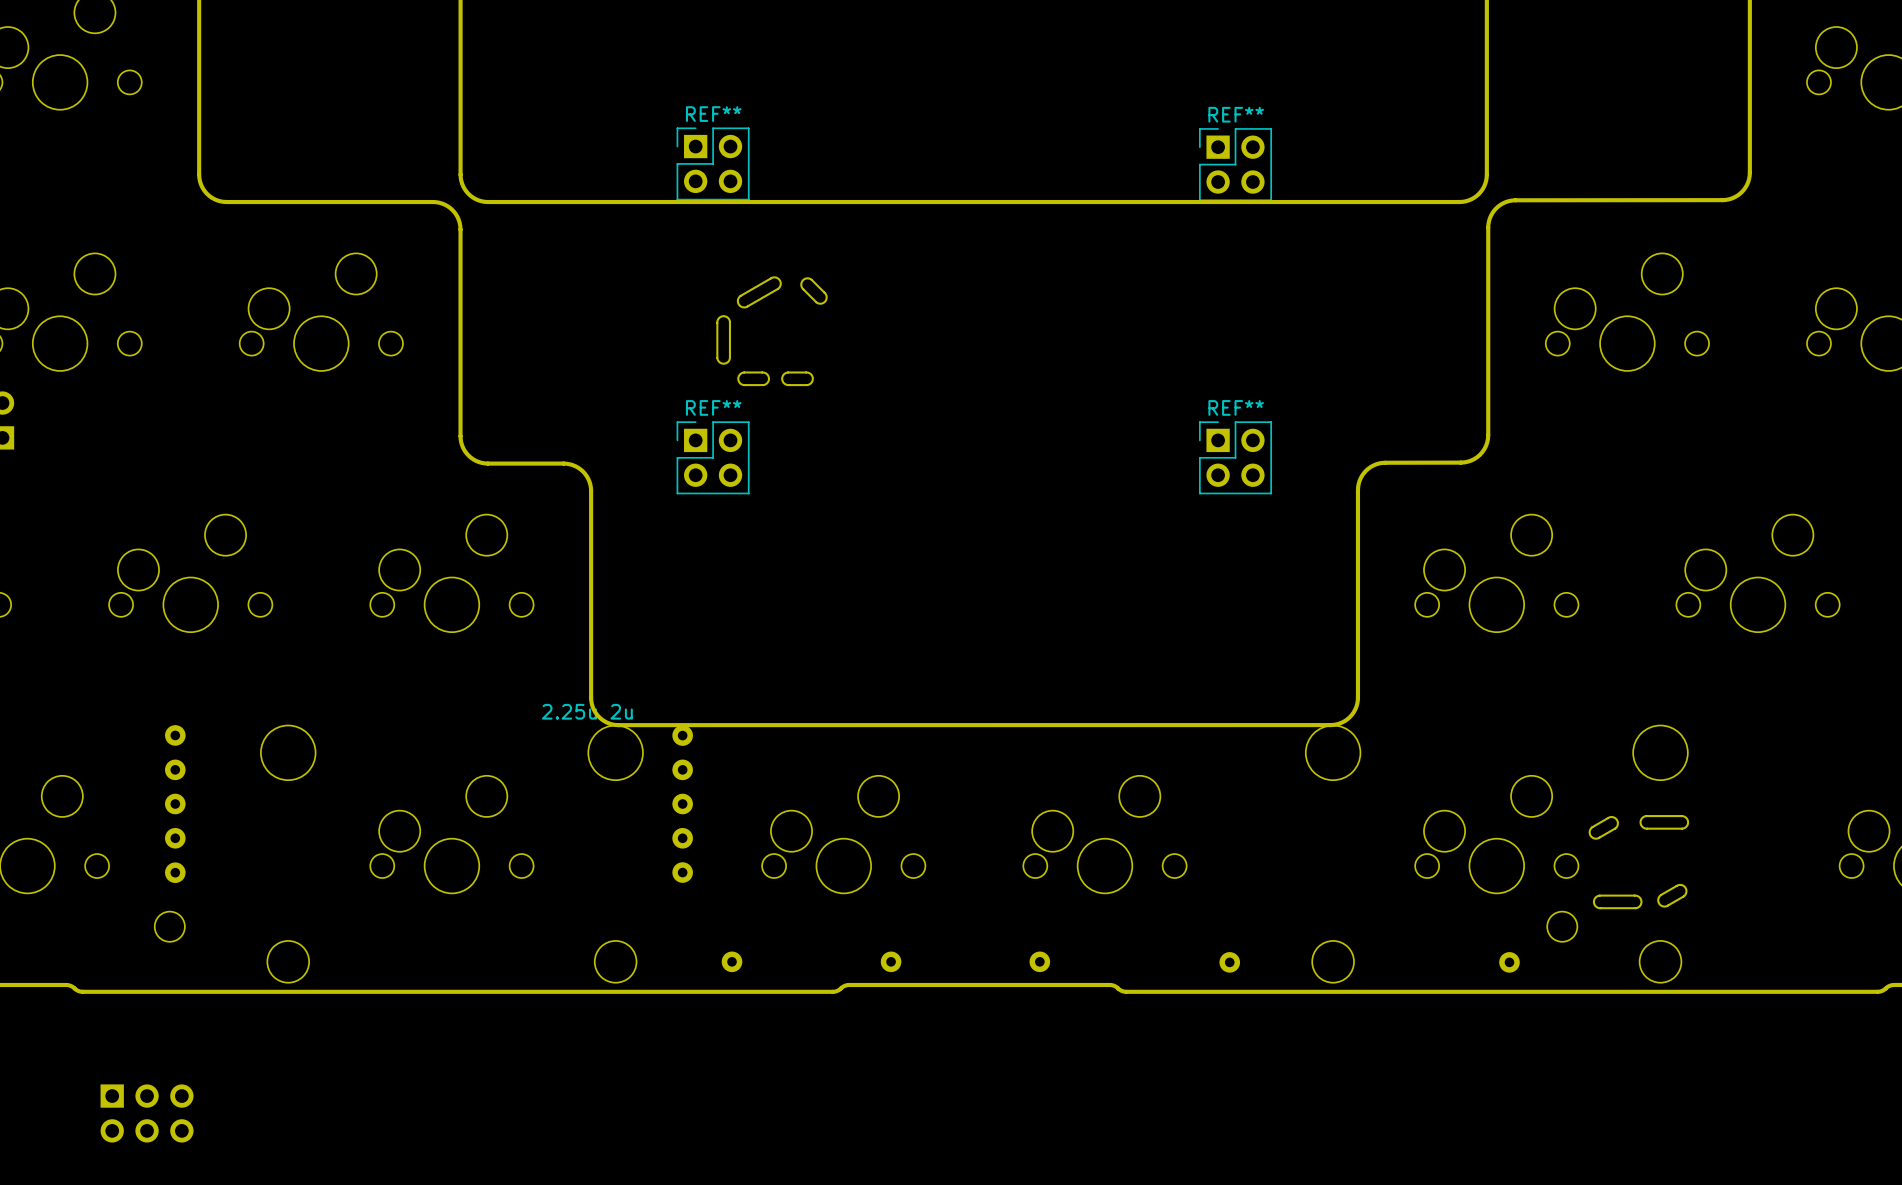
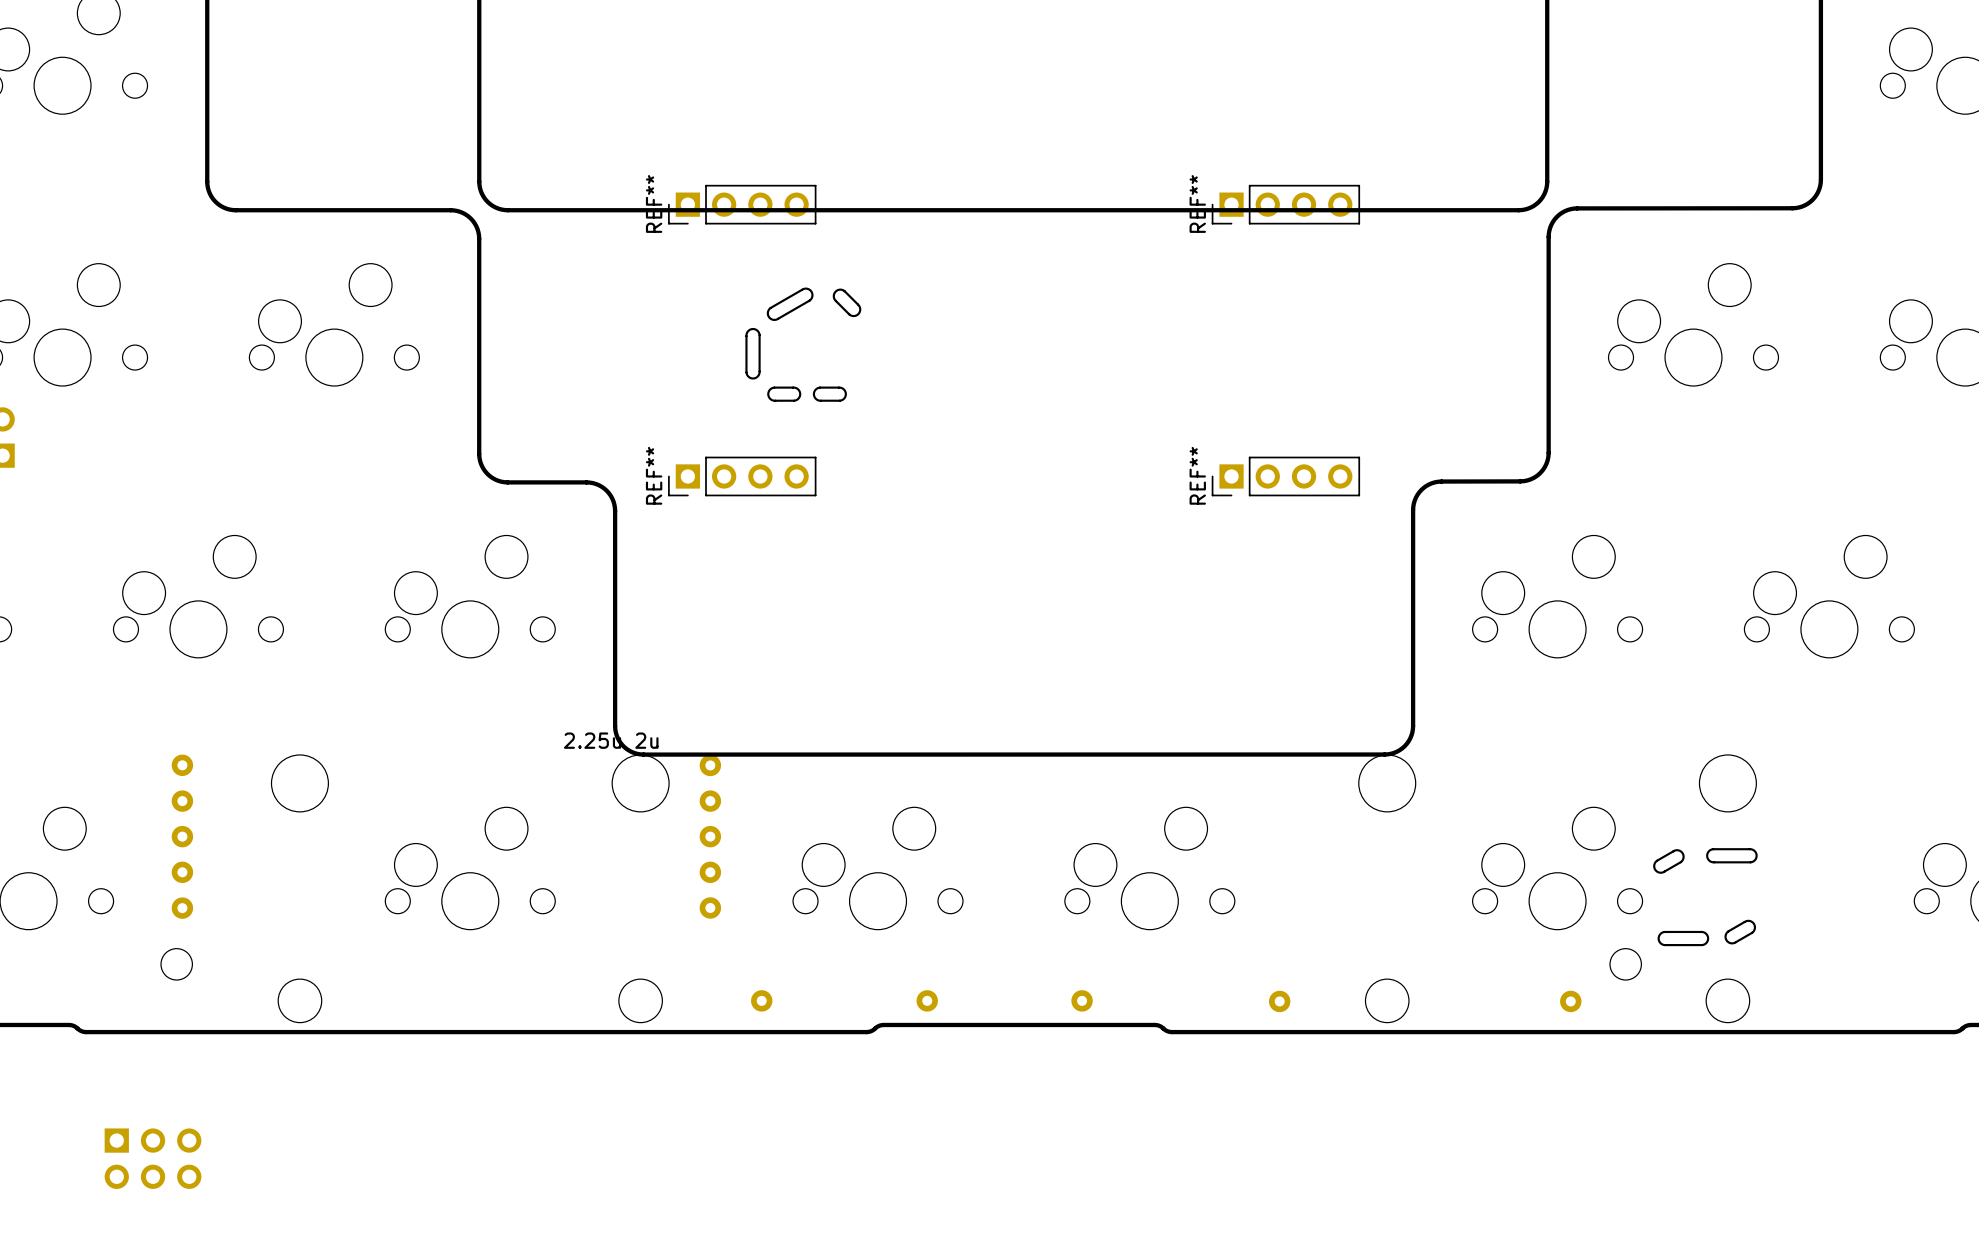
REF**: (713, 163) -> none
REF**: (1235, 164) -> none
REF**: none -> (742, 204)
REF**: none -> (1285, 204)
REF** name position: REF** (713, 407) -> REF** (654, 475)
REF** name position: REF** (1236, 407) -> REF** (1197, 475)
REF** footprint: [676, 421, 750, 495] -> [668, 456, 817, 497]
REF** footprint: [1199, 421, 1272, 495] -> [1211, 456, 1361, 497]

